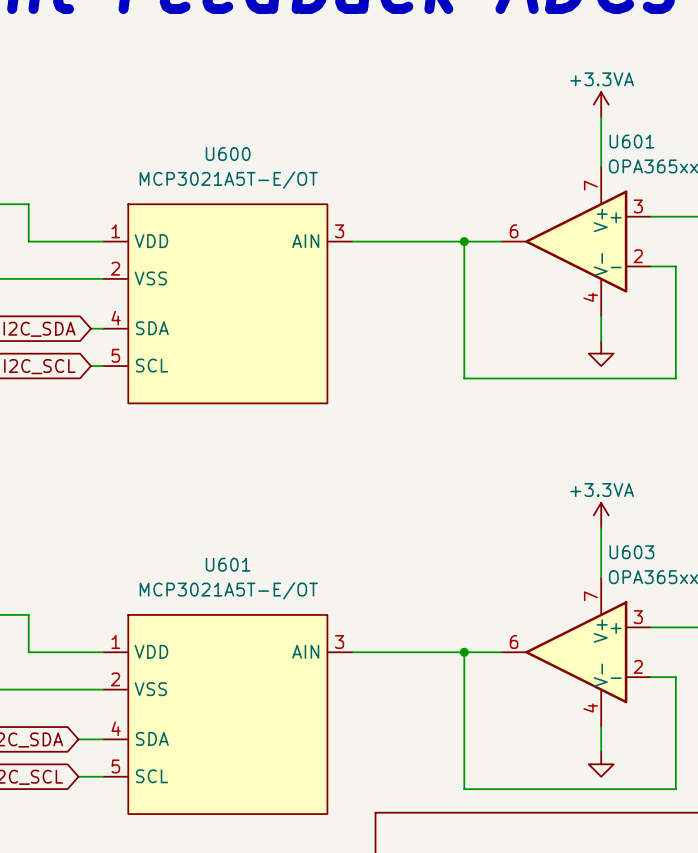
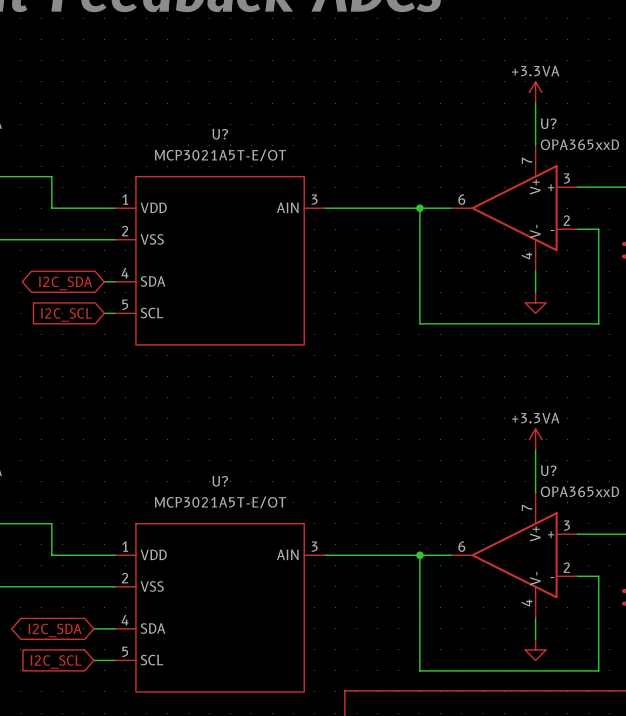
U601 name: U601 (631, 141) -> U? (548, 123)
U600 name: U600 (228, 154) -> U? (220, 134)
U603 name: U603 (631, 552) -> U? (548, 470)
U601 name: U601 (228, 564) -> U? (220, 481)

